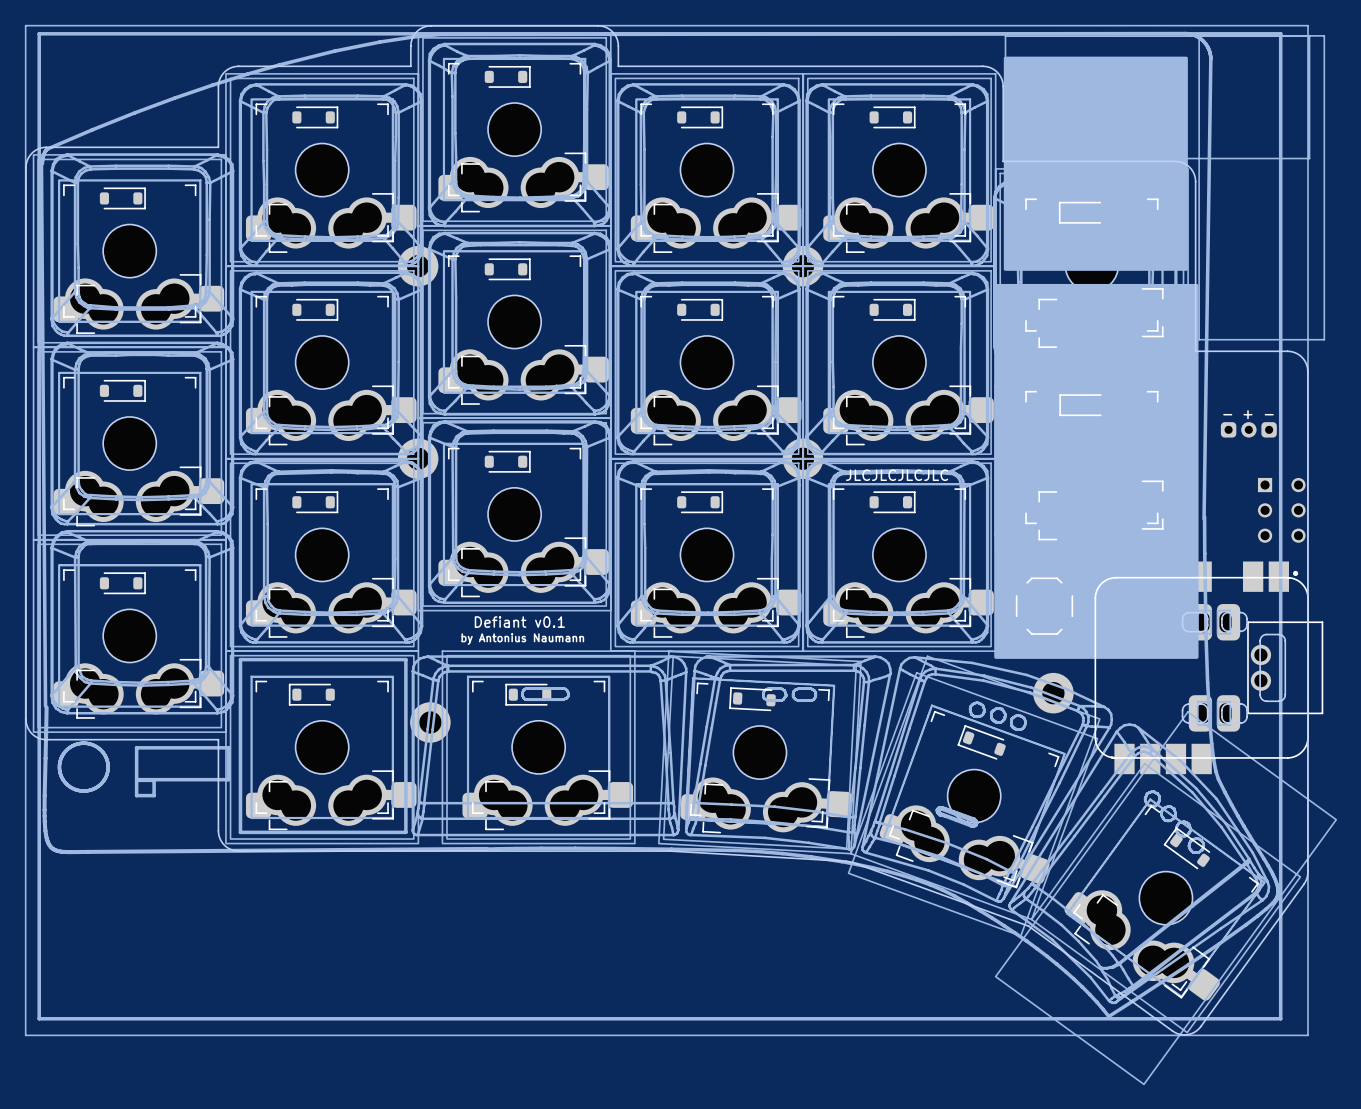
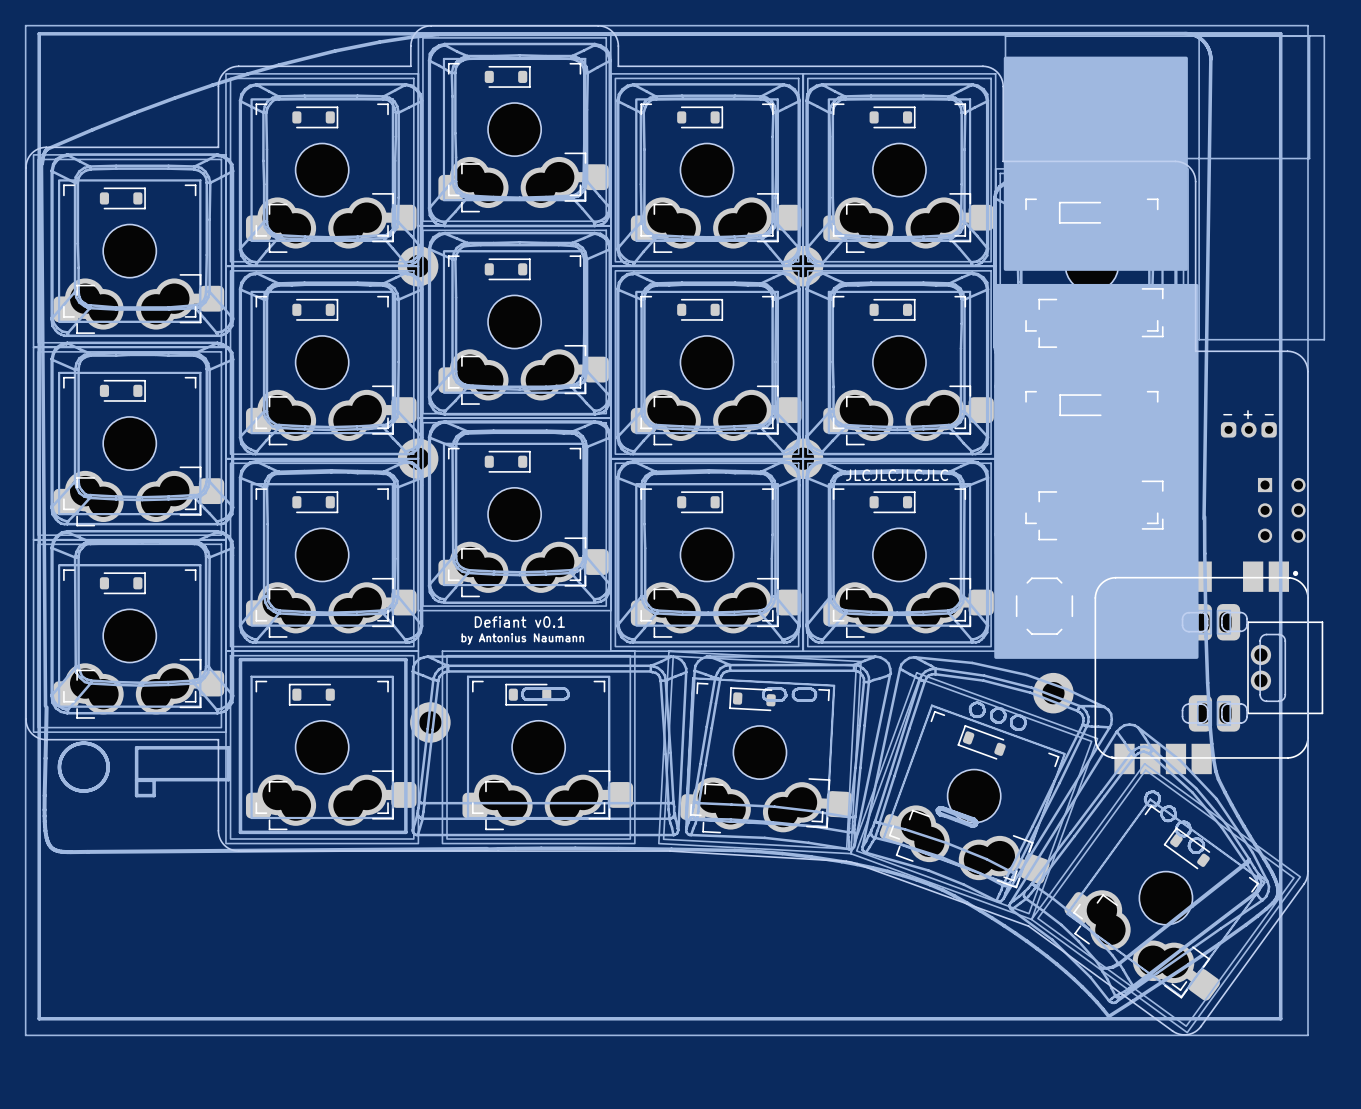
part footprint: [848, 656, 1100, 937] -> [850, 672, 1099, 920]
part footprint: [995, 711, 1337, 1085] -> [1031, 763, 1301, 1034]

